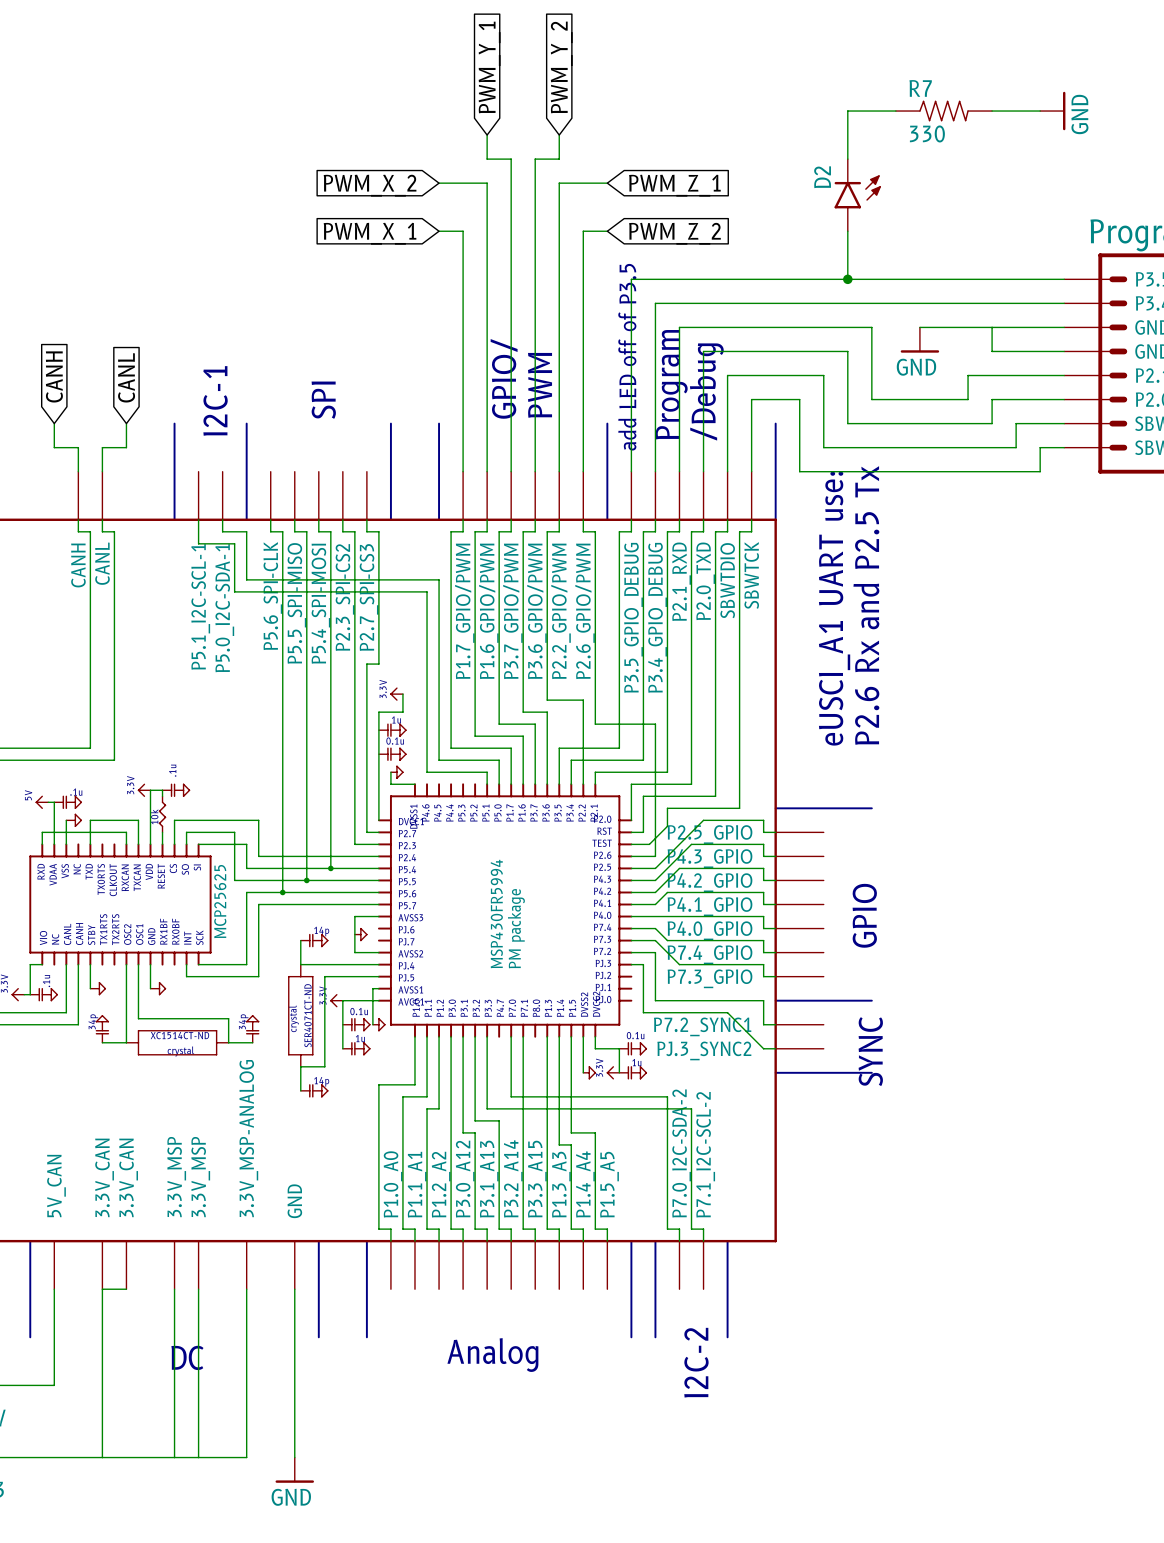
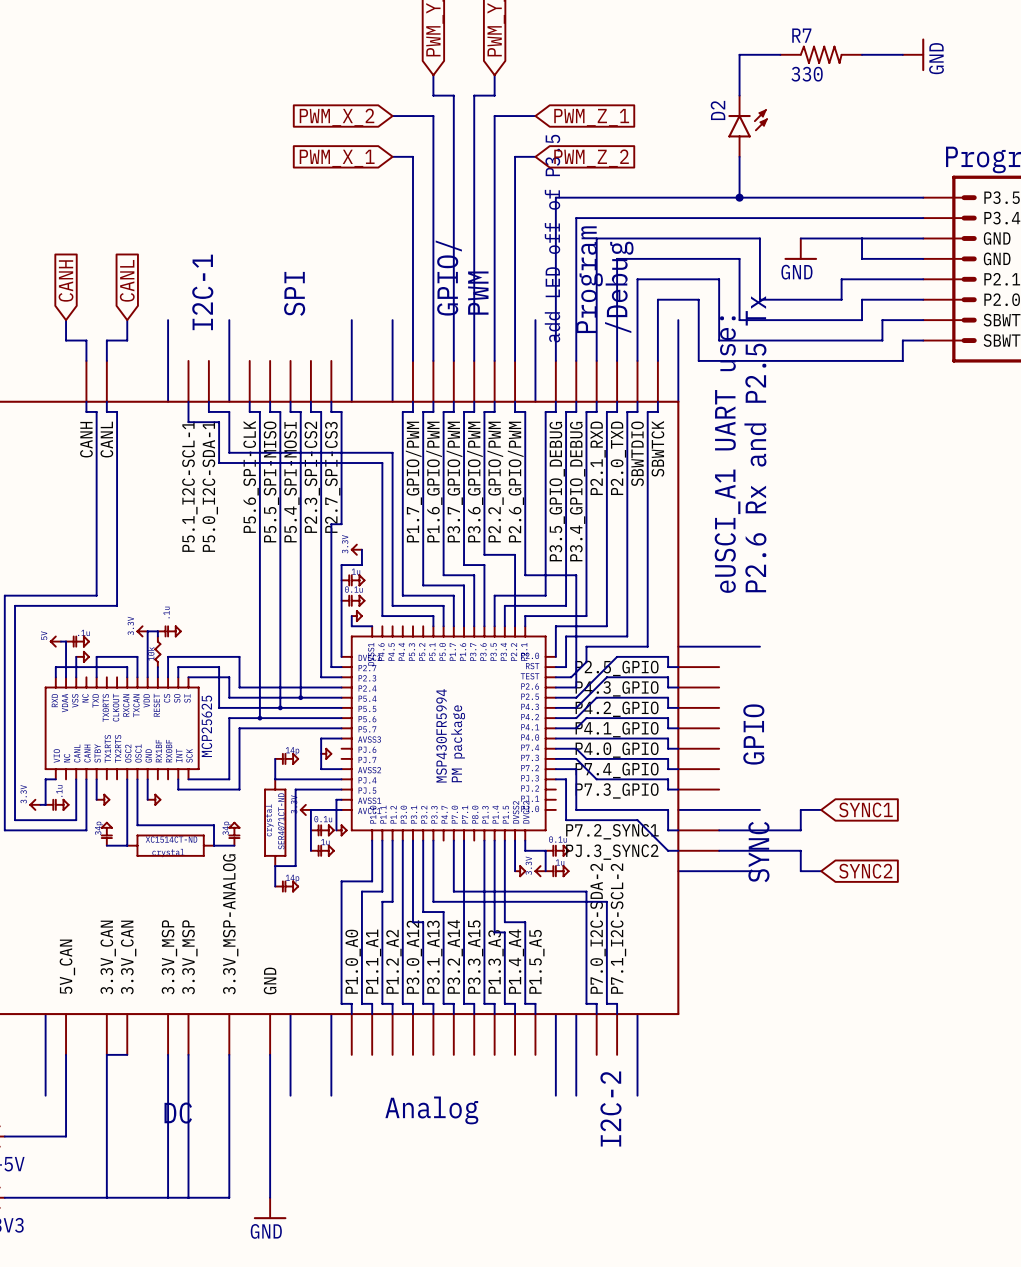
wire: none -> (821, 809) (800, 809) (800, 830) (719, 830)
global label: none -> SYNC1 (865, 809)
wire: none -> (719, 850) (800, 850) (800, 871) (821, 871)
global label: none -> SYNC2 (865, 871)

